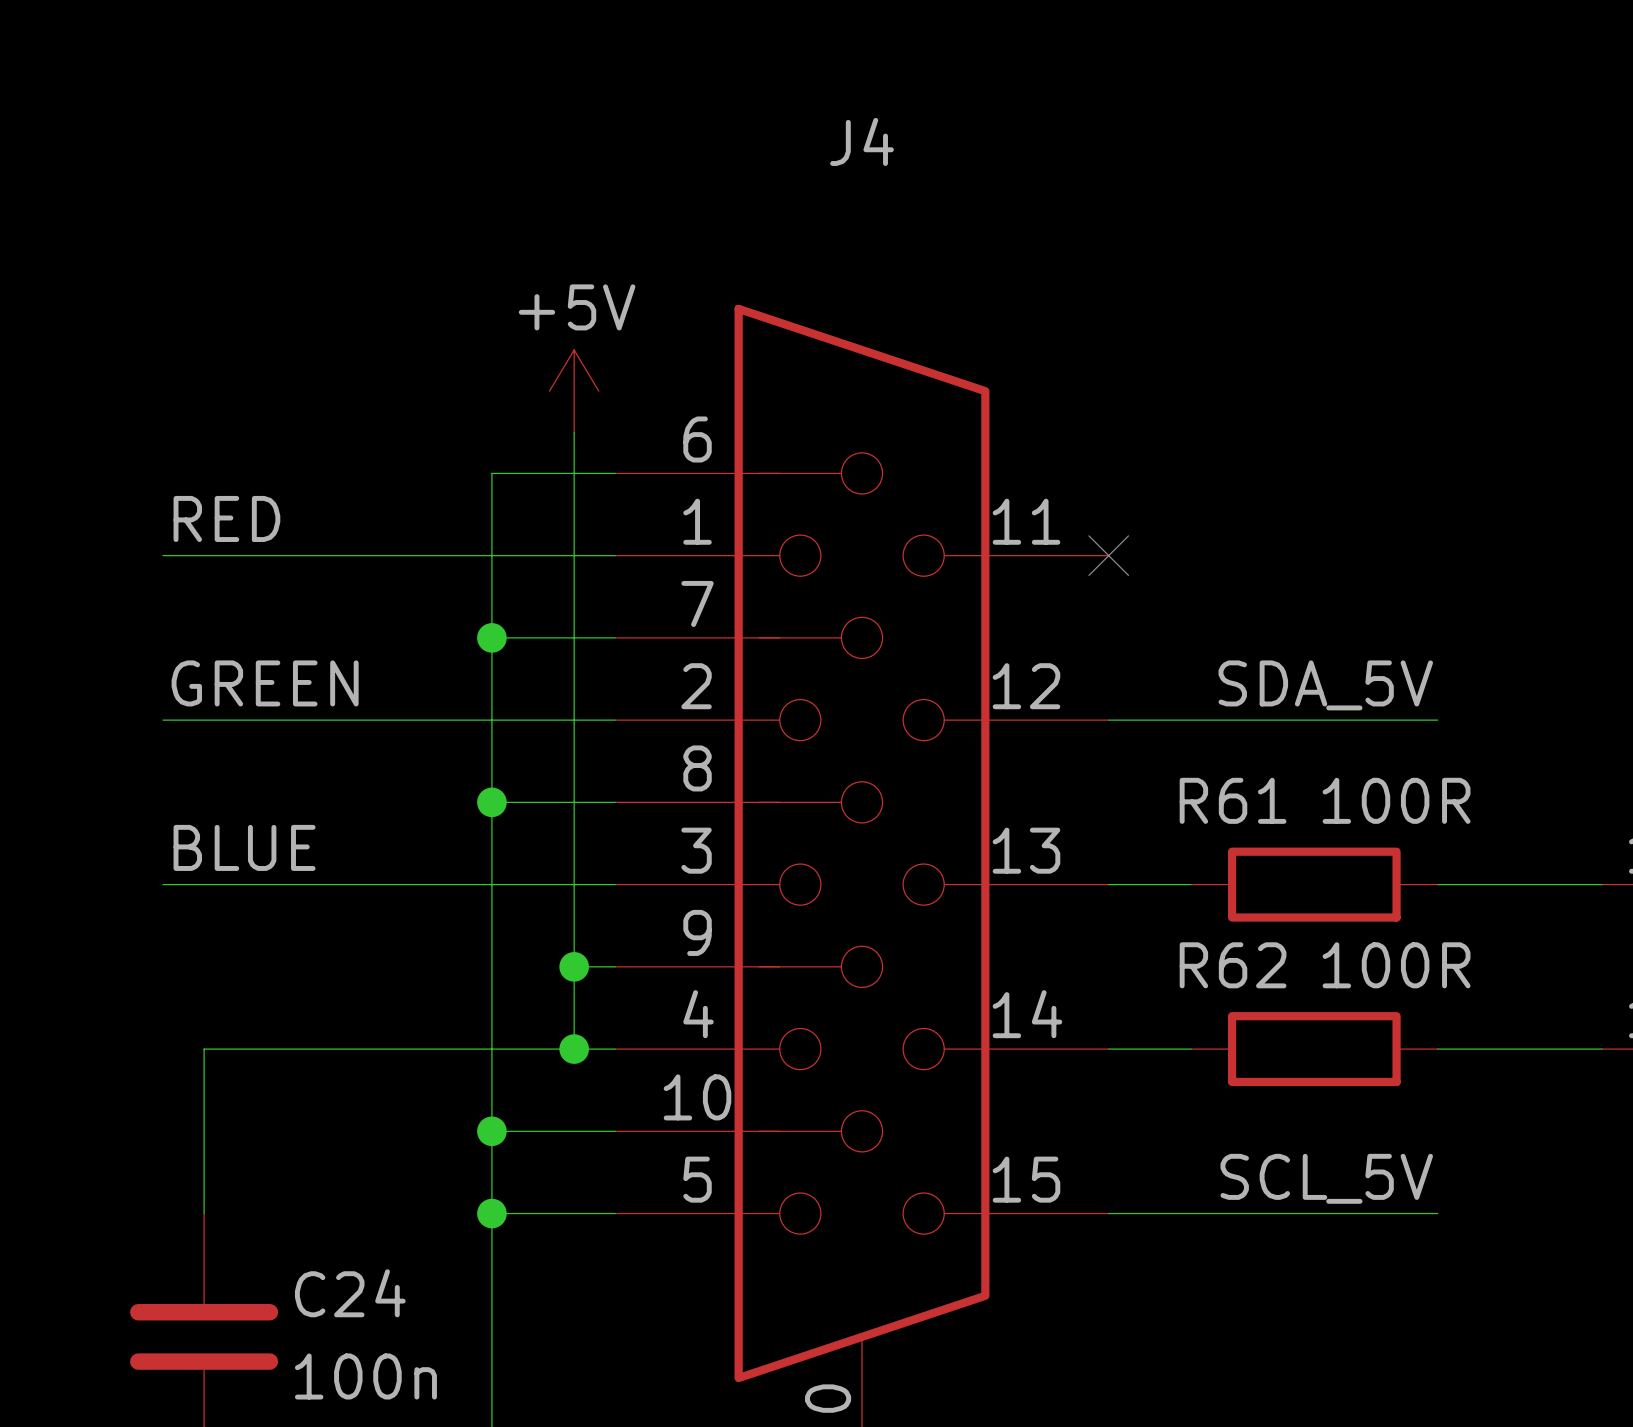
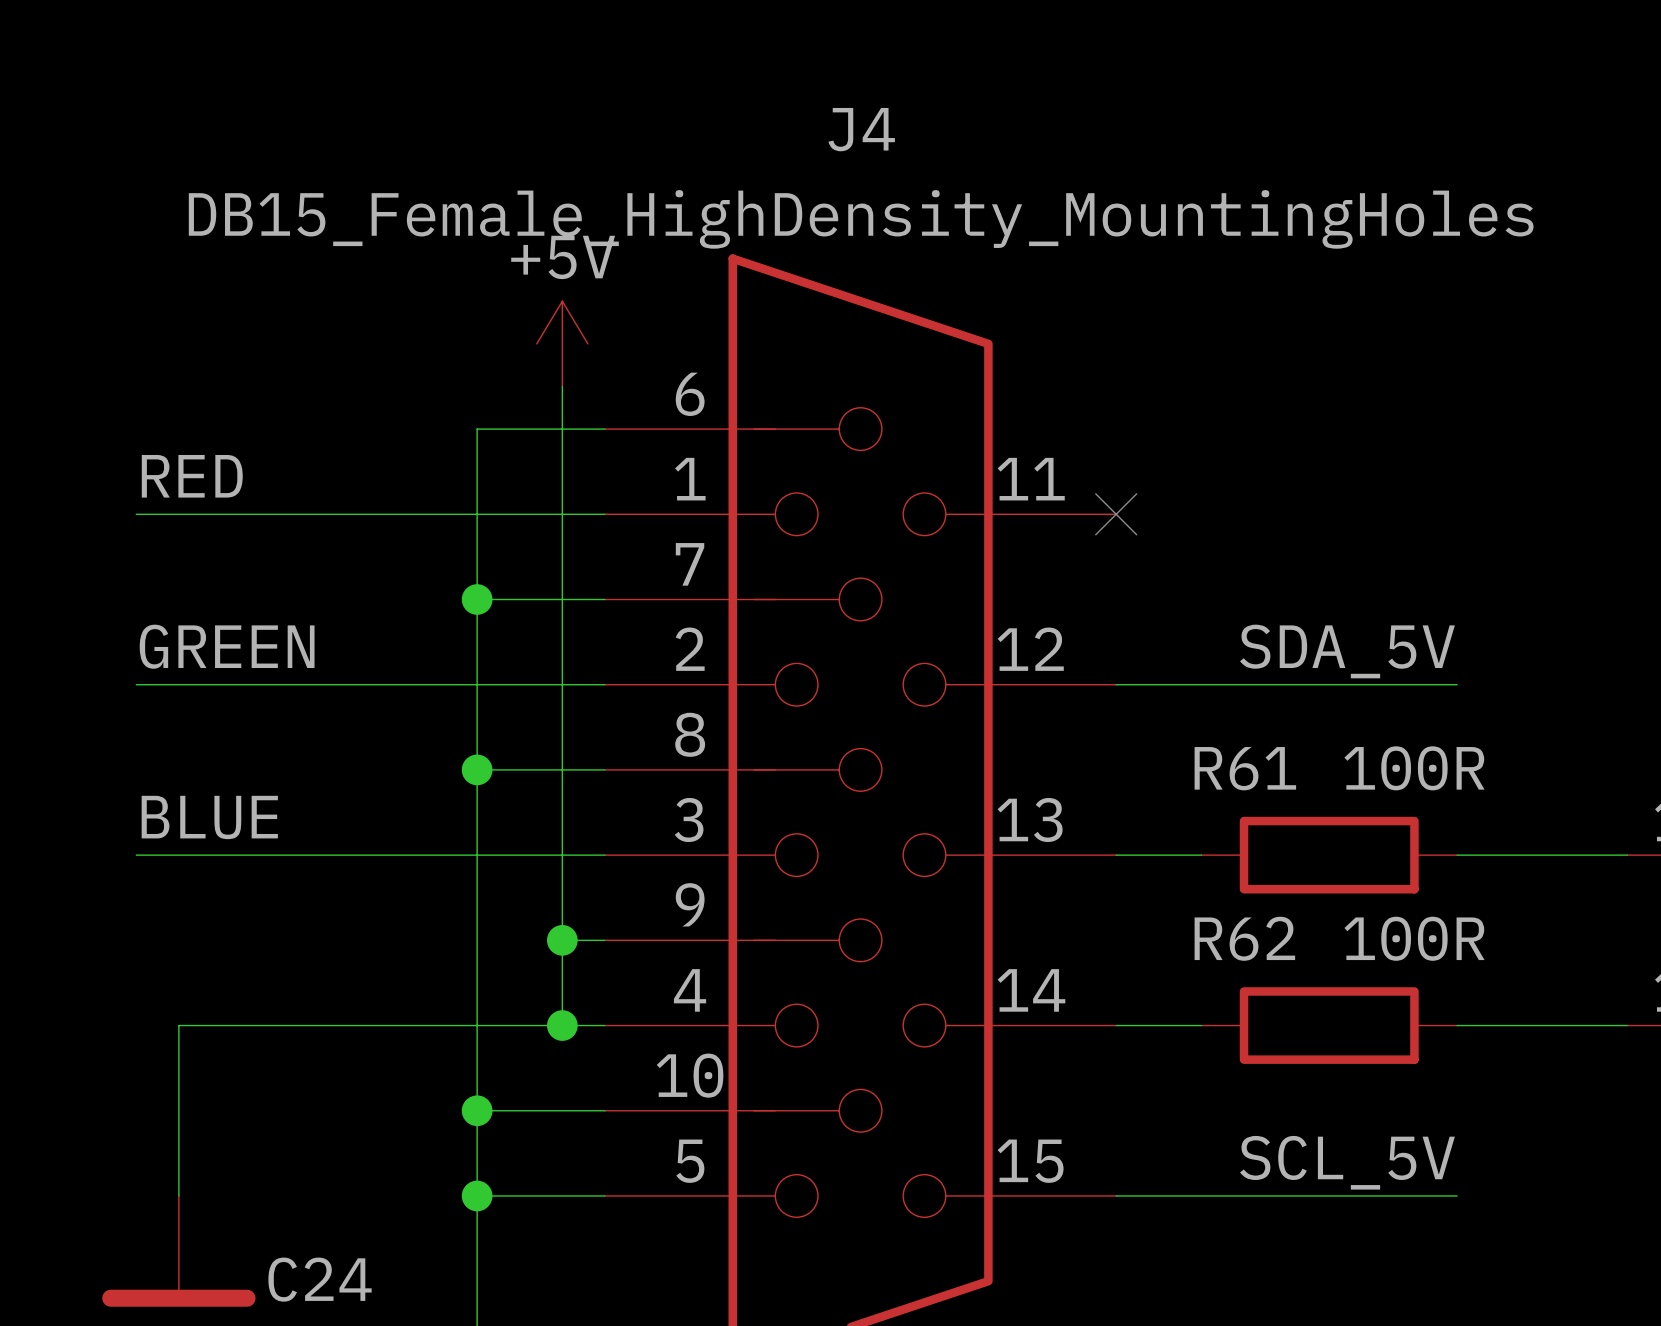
J4 name position: J4 (862, 141) -> J4 (861, 129)
J4 value: none -> DB15_Female_HighDensity_MountingHoles (861, 219)

